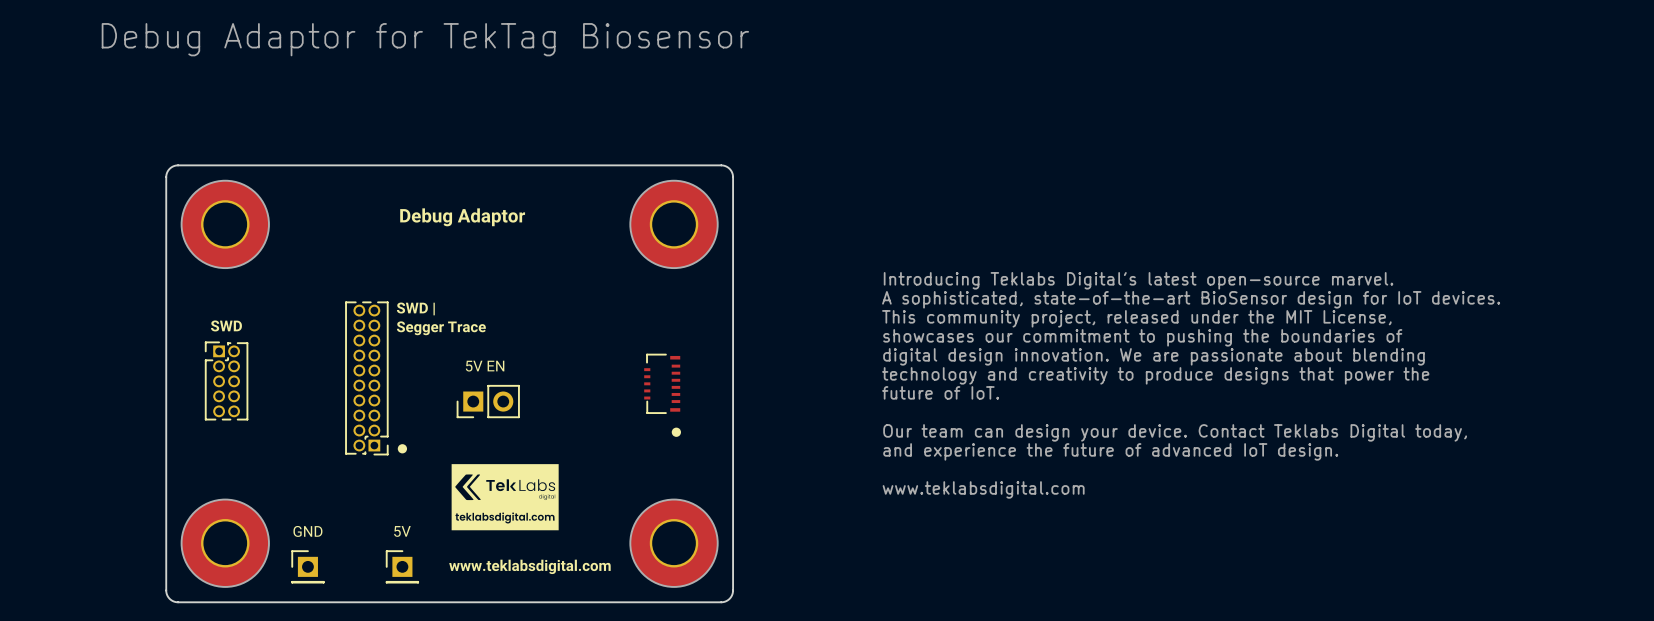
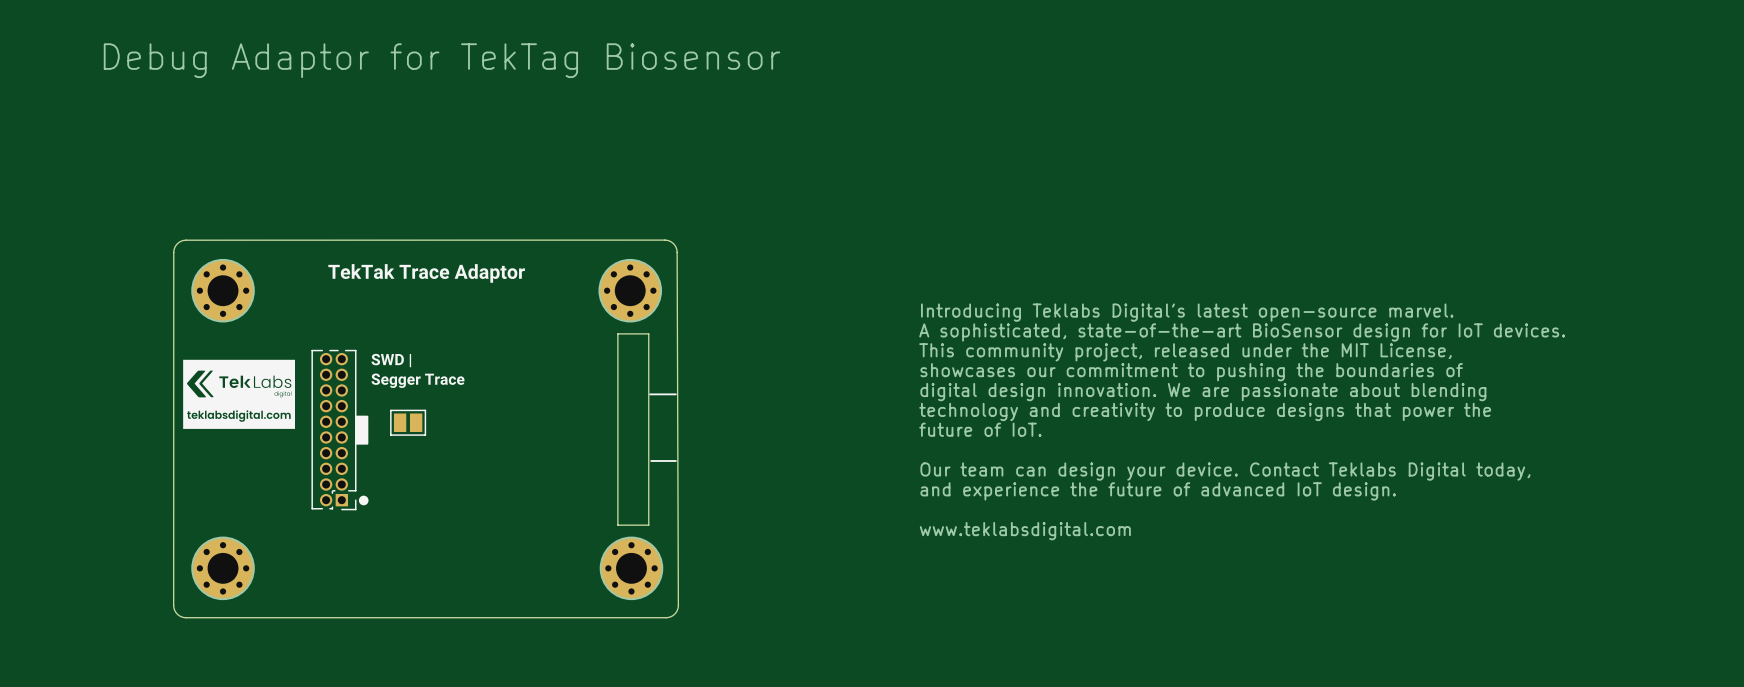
board edge: (178, 165) (721, 165) (728, 167) (733, 177) (733, 590) (730, 597) (721, 602) (178, 602) (170, 599) (166, 590) (166, 177) (169, 168) (178, 165) -> (664, 240) (186, 240) (178, 242) (173, 252) (173, 605) (176, 613) (186, 617) (666, 617) (673, 615) (678, 605) (677, 252) (673, 243) (664, 240)
drawing: [400, 208, 526, 227] -> none
part: (225, 224) -> none
part: (674, 224) -> none
drawing: none -> [328, 264, 525, 283]
part: none -> (223, 290)
part: none -> (630, 290)
board edge: none -> (617, 333) (648, 333) (648, 525) (617, 525) (617, 333)
drawing position: (441, 318) -> (418, 370)
drawing: [210, 320, 242, 332] -> none
drawing: none -> [183, 359, 296, 429]
line: none -> (649, 394) (675, 394)
drawing: [465, 360, 505, 372] -> none
part position: (366, 378) -> (333, 430)
drawing: none -> [355, 415, 369, 445]
part: (226, 380) -> none
part: (662, 383) -> none
part: none -> (408, 422)
part: (488, 401) -> none
line: none -> (651, 460) (675, 460)
drawing: [671, 427, 682, 437] -> none
drawing position: (402, 448) -> (363, 500)
drawing: [451, 464, 559, 531] -> none
part: none -> (223, 568)
drawing: [293, 525, 323, 537] -> none
part: none -> (631, 568)
drawing: [394, 526, 411, 537] -> none
part: (225, 543) -> none
part: (674, 543) -> none
drawing: [449, 559, 611, 575] -> none
part: (307, 566) -> none
part: (402, 566) -> none

